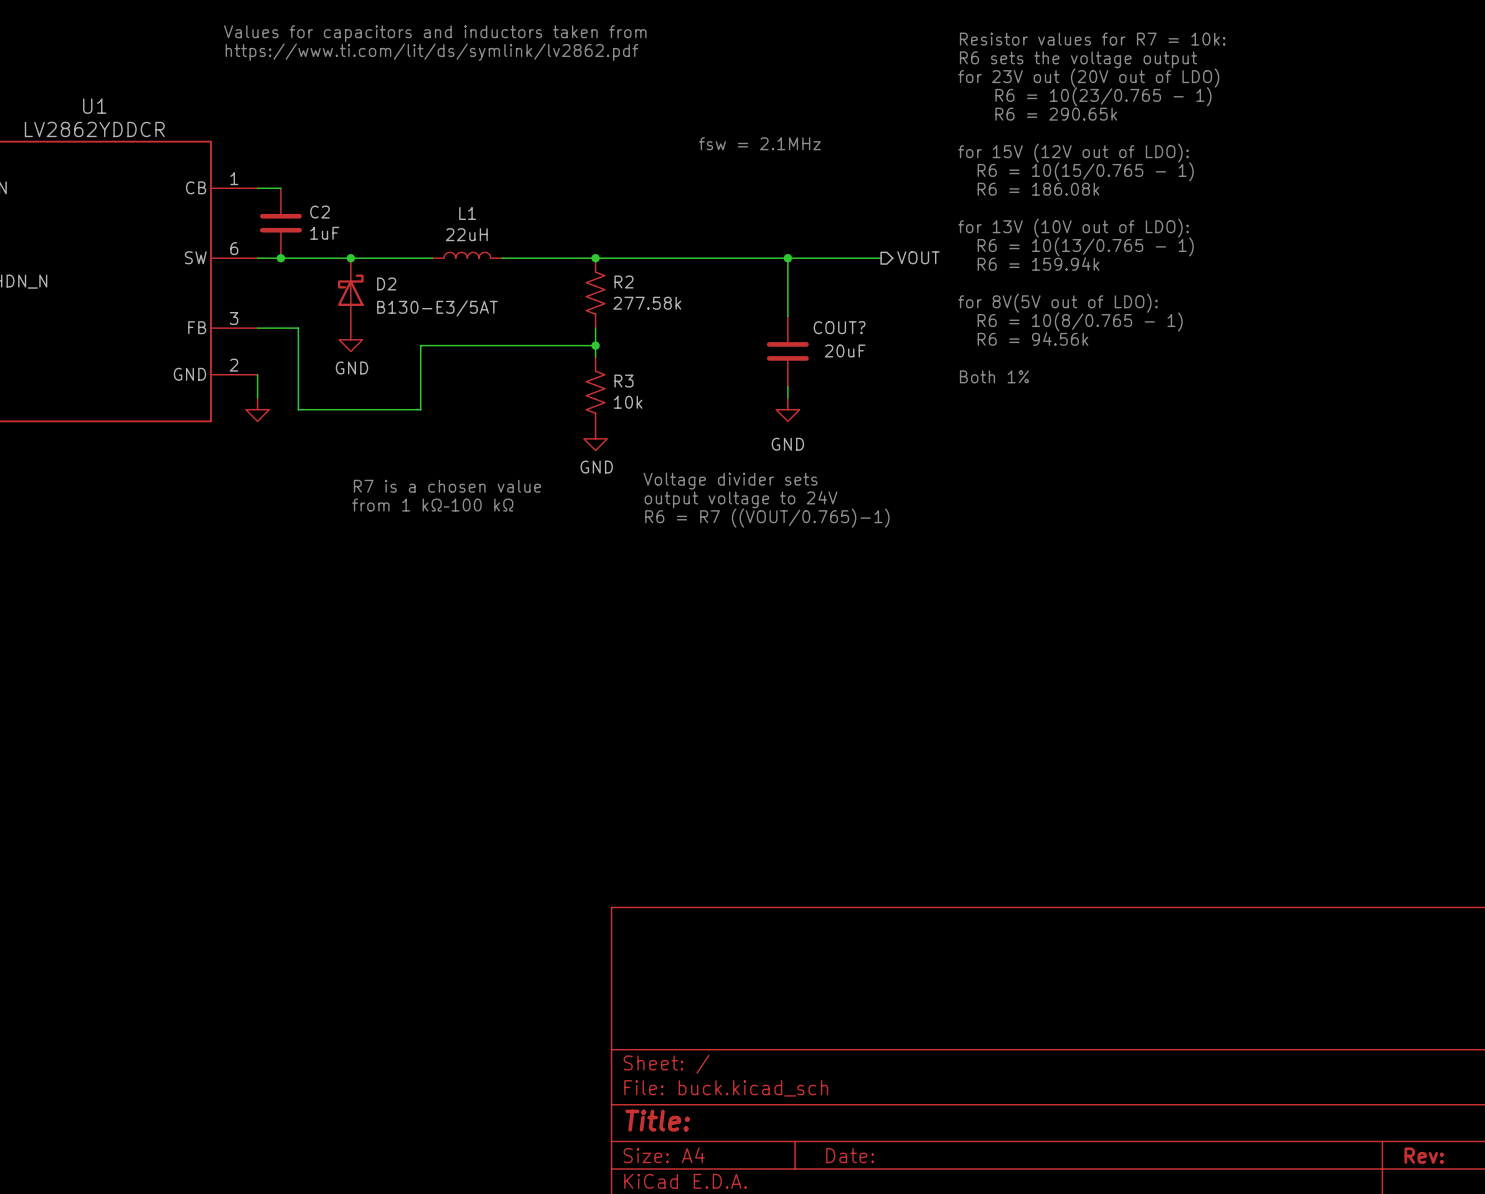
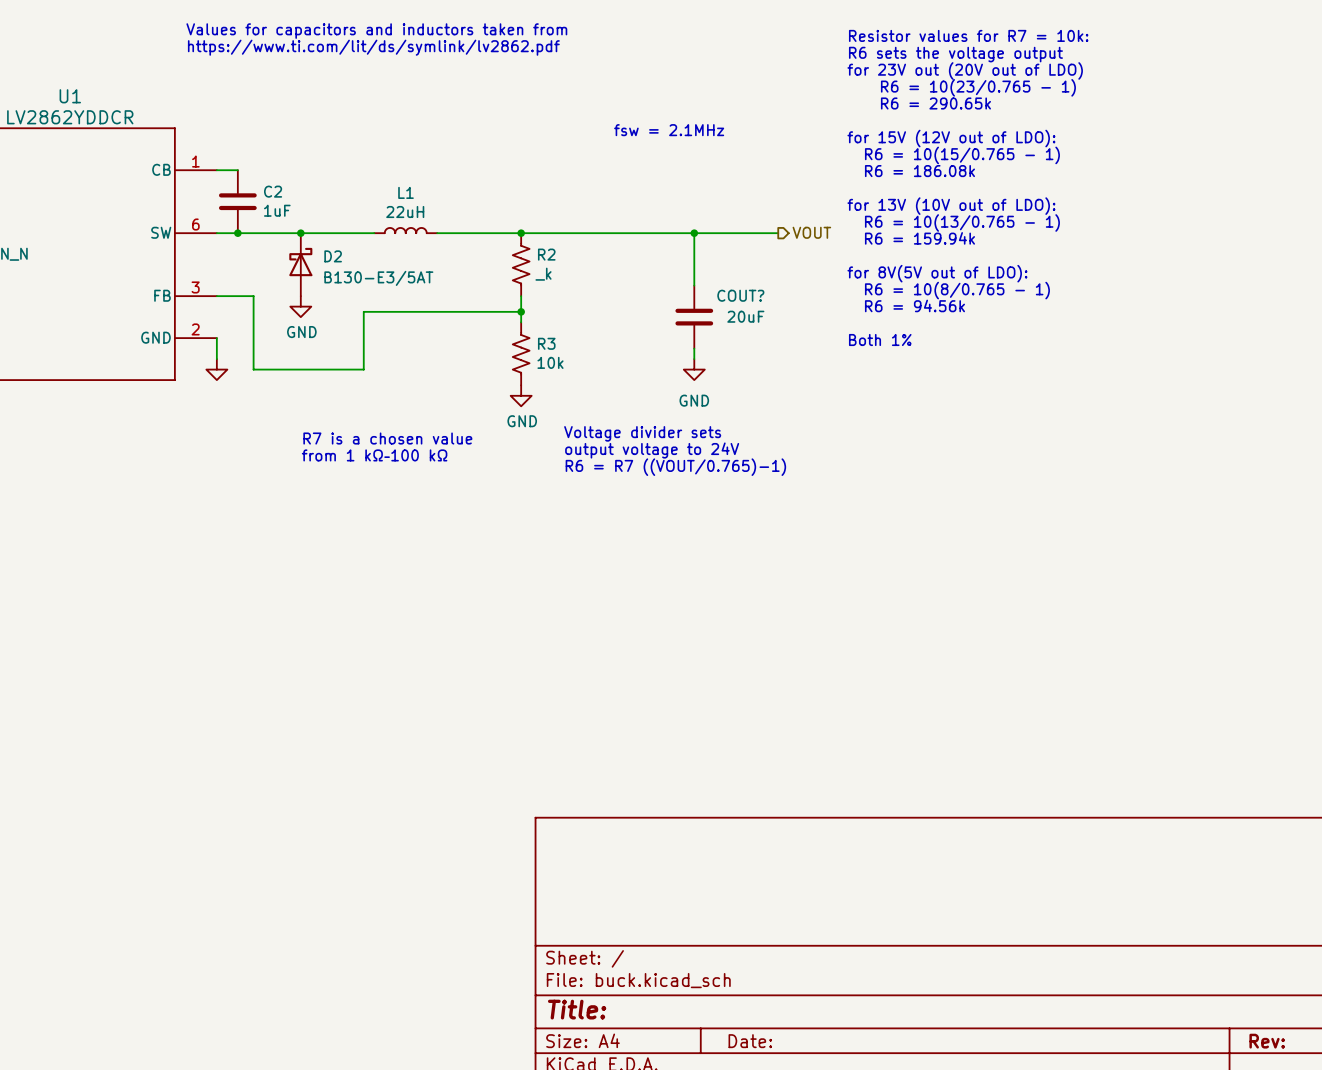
R2 value: 277.58k (647, 303) -> _k (543, 274)

